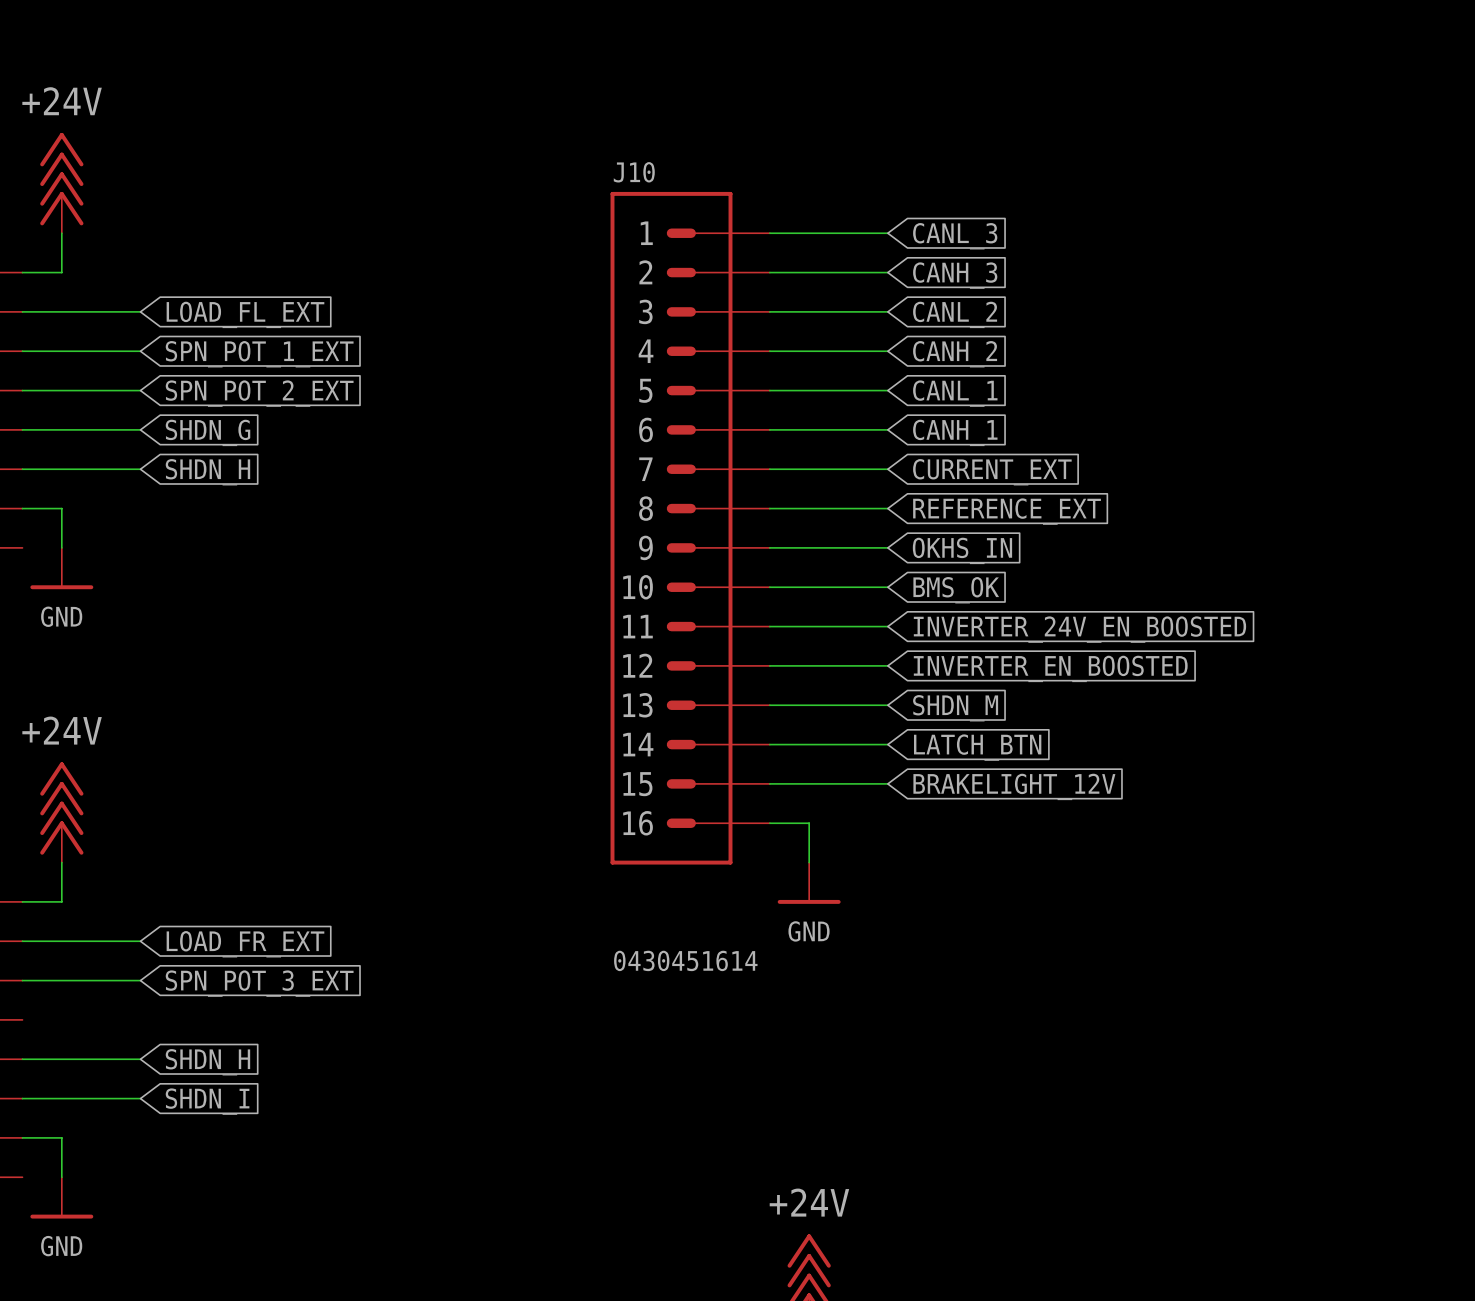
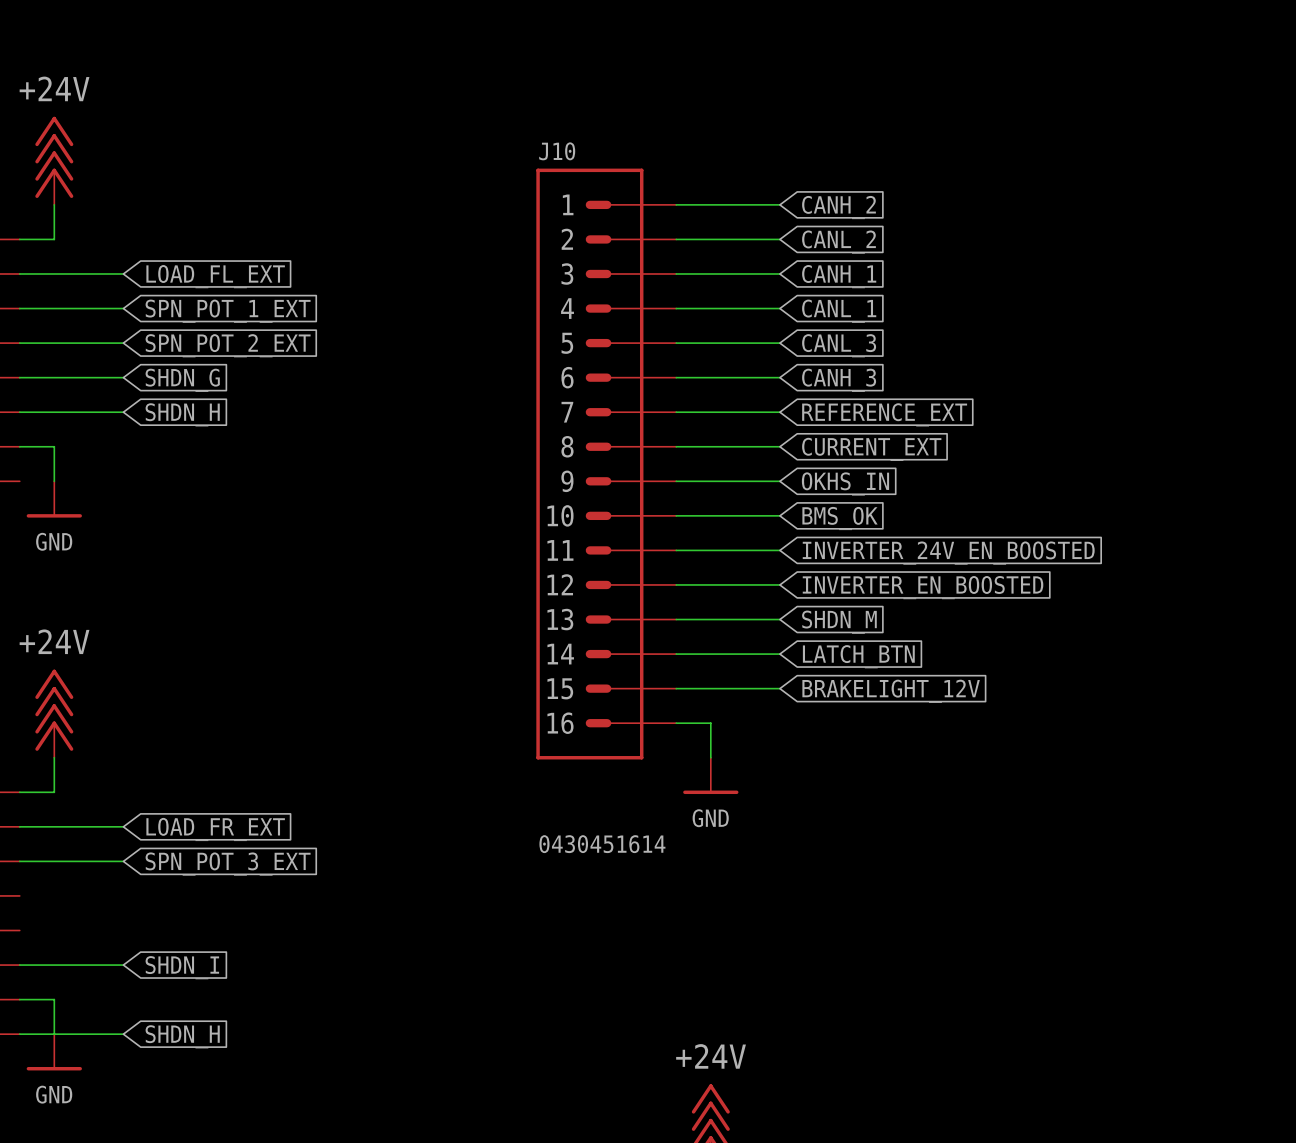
global label: CANL_3 (955, 236) -> CANH_2 (838, 207)
global label: CANH_3 (955, 275) -> CANL_2 (838, 242)
global label: CANL_2 (955, 314) -> CANH_1 (839, 276)
global label: CANH_2 (955, 354) -> CANL_1 (839, 311)
global label: CANL_1 (955, 393) -> CANL_3 (839, 345)
global label: CANH_1 (955, 432) -> CANH_3 (839, 380)
global label: CURRENT_EXT (992, 472) -> REFERENCE_EXT (884, 414)
global label: REFERENCE_EXT (1007, 511) -> CURRENT_EXT (871, 449)
wire: (22, 1059) (140, 1059) -> (19, 1034) (123, 1034)
global label position: SHDN_H (207, 1062) -> SHDN_H (182, 1036)

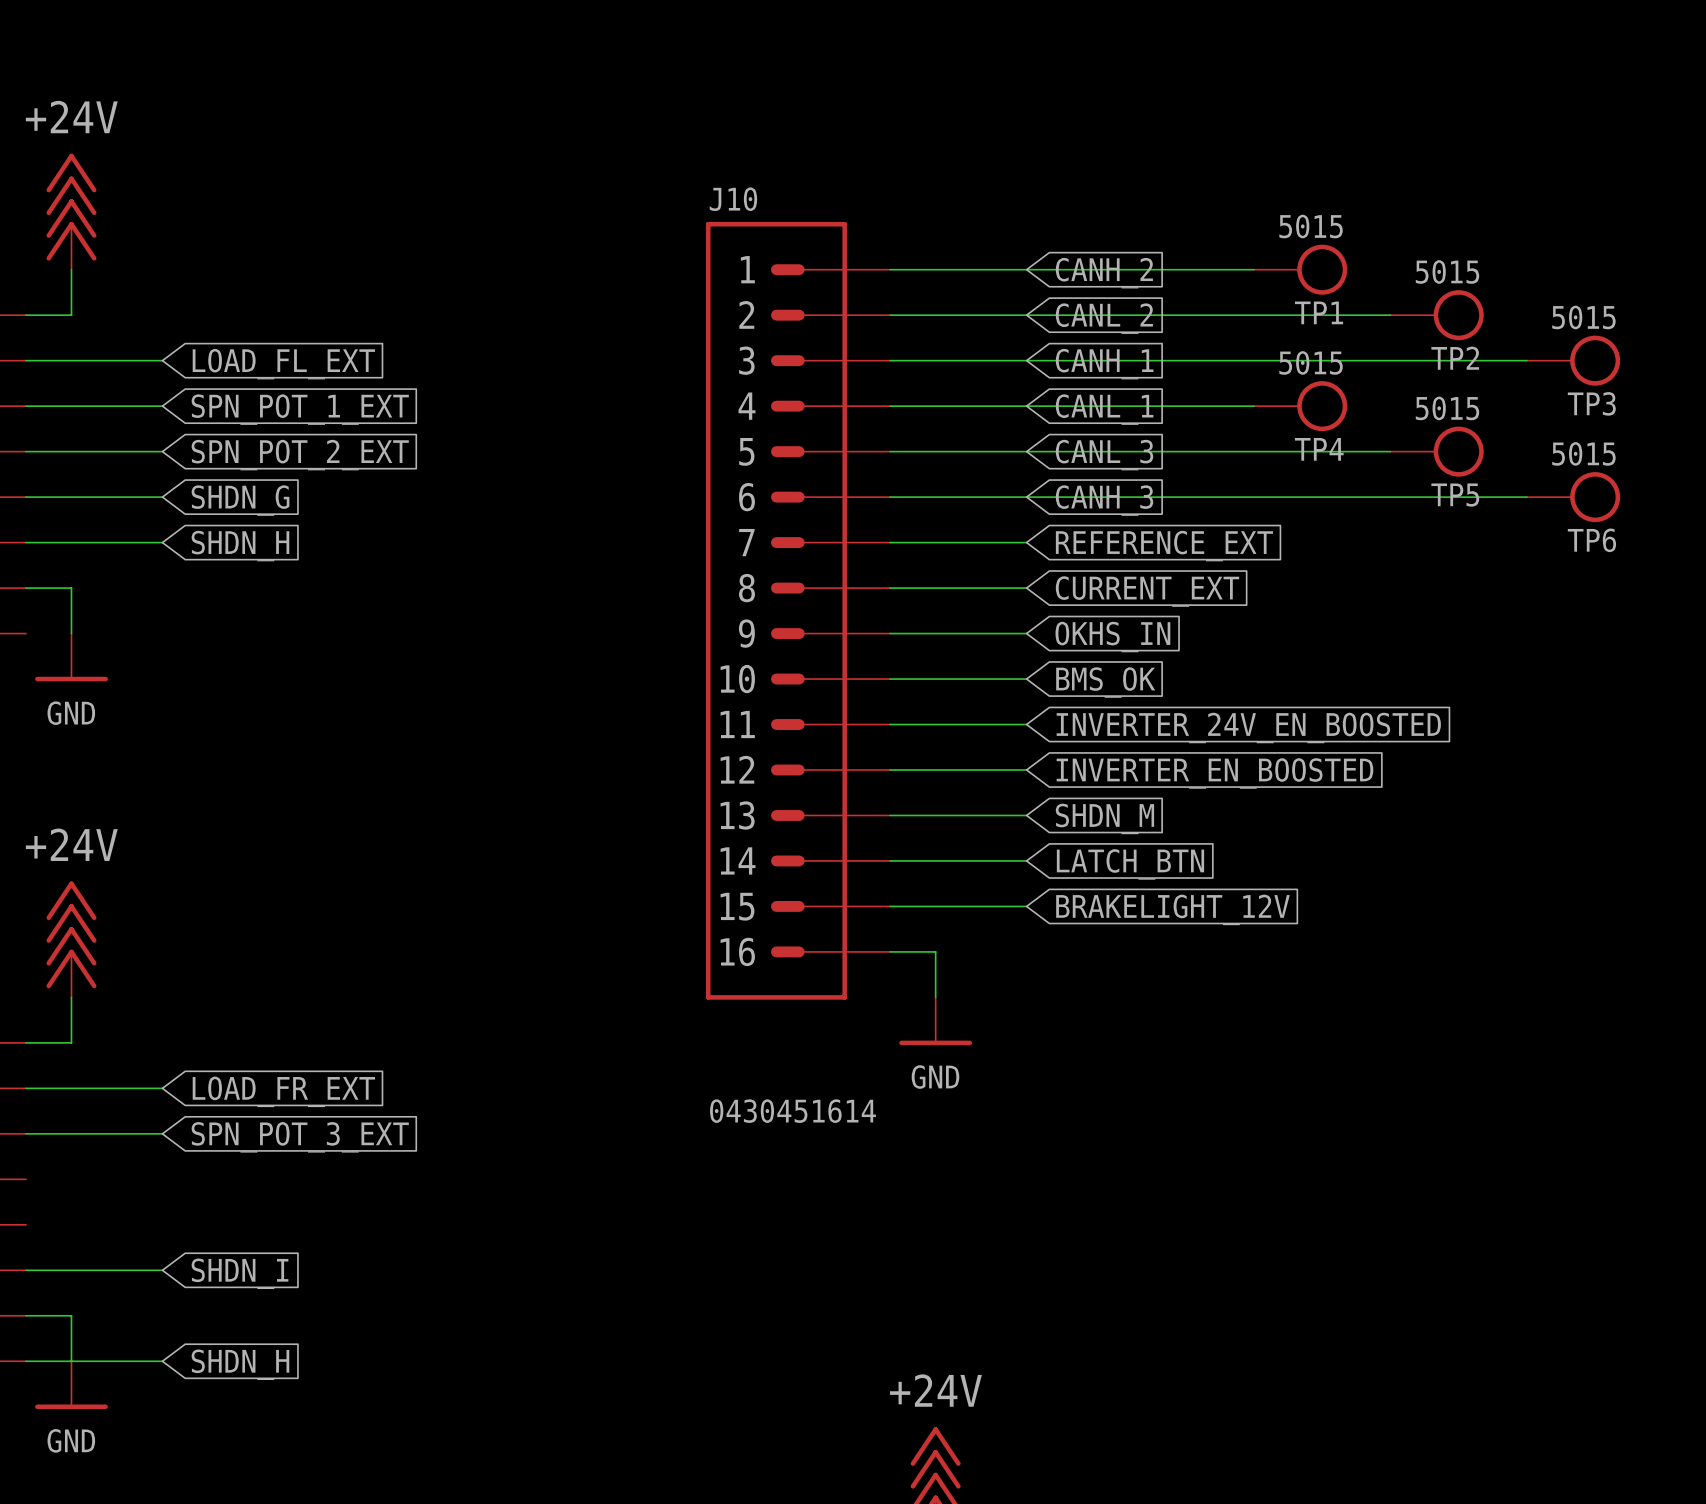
wire: none -> (1026, 269) (1254, 269)
TP1: none -> (1300, 269)
wire: none -> (1026, 315) (1390, 315)
TP2: none -> (1437, 315)
wire: none -> (1026, 360) (1526, 360)
TP3: none -> (1573, 360)
wire: none -> (1026, 406) (1254, 406)
TP4: none -> (1300, 406)
wire: none -> (1026, 451) (1390, 451)
TP5: none -> (1437, 451)
wire: none -> (1026, 497) (1526, 497)
TP6: none -> (1573, 497)

